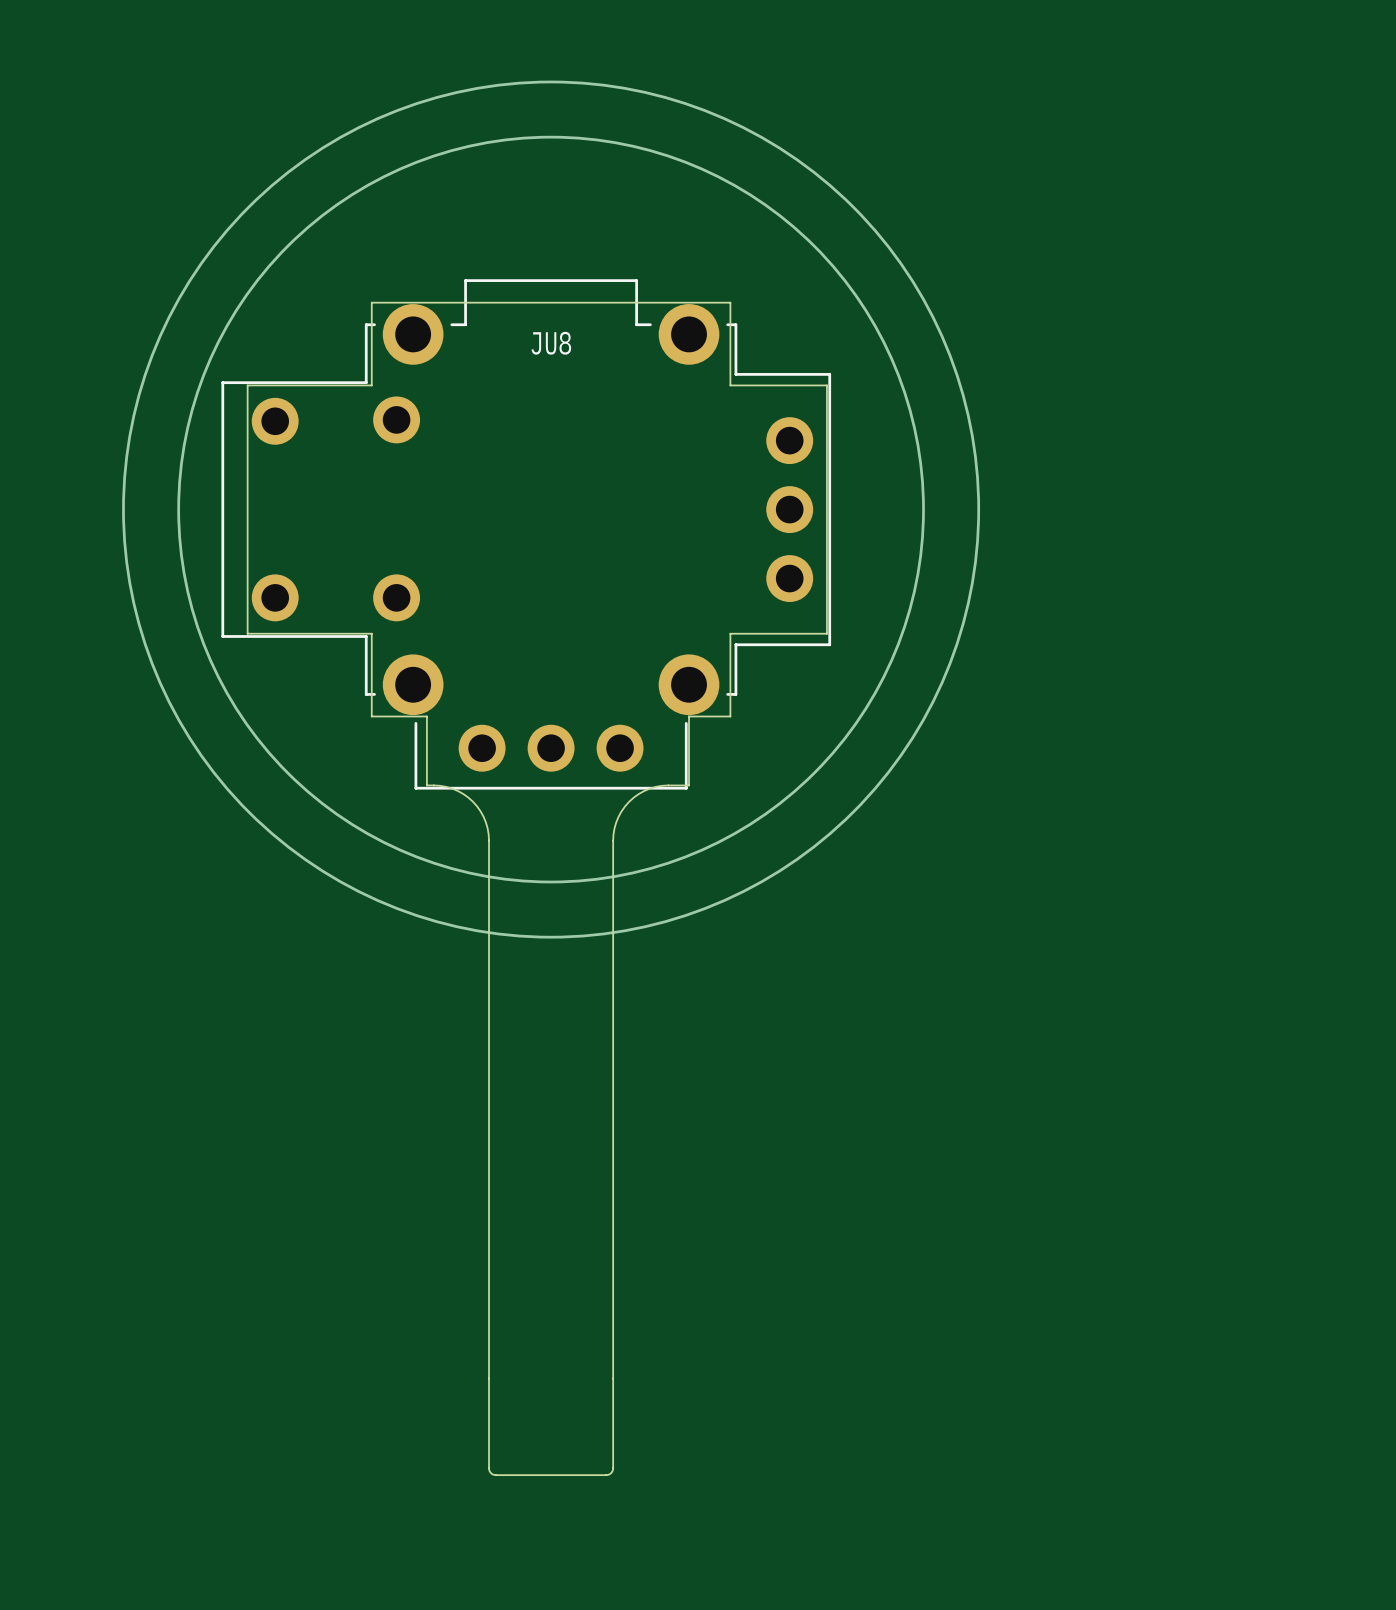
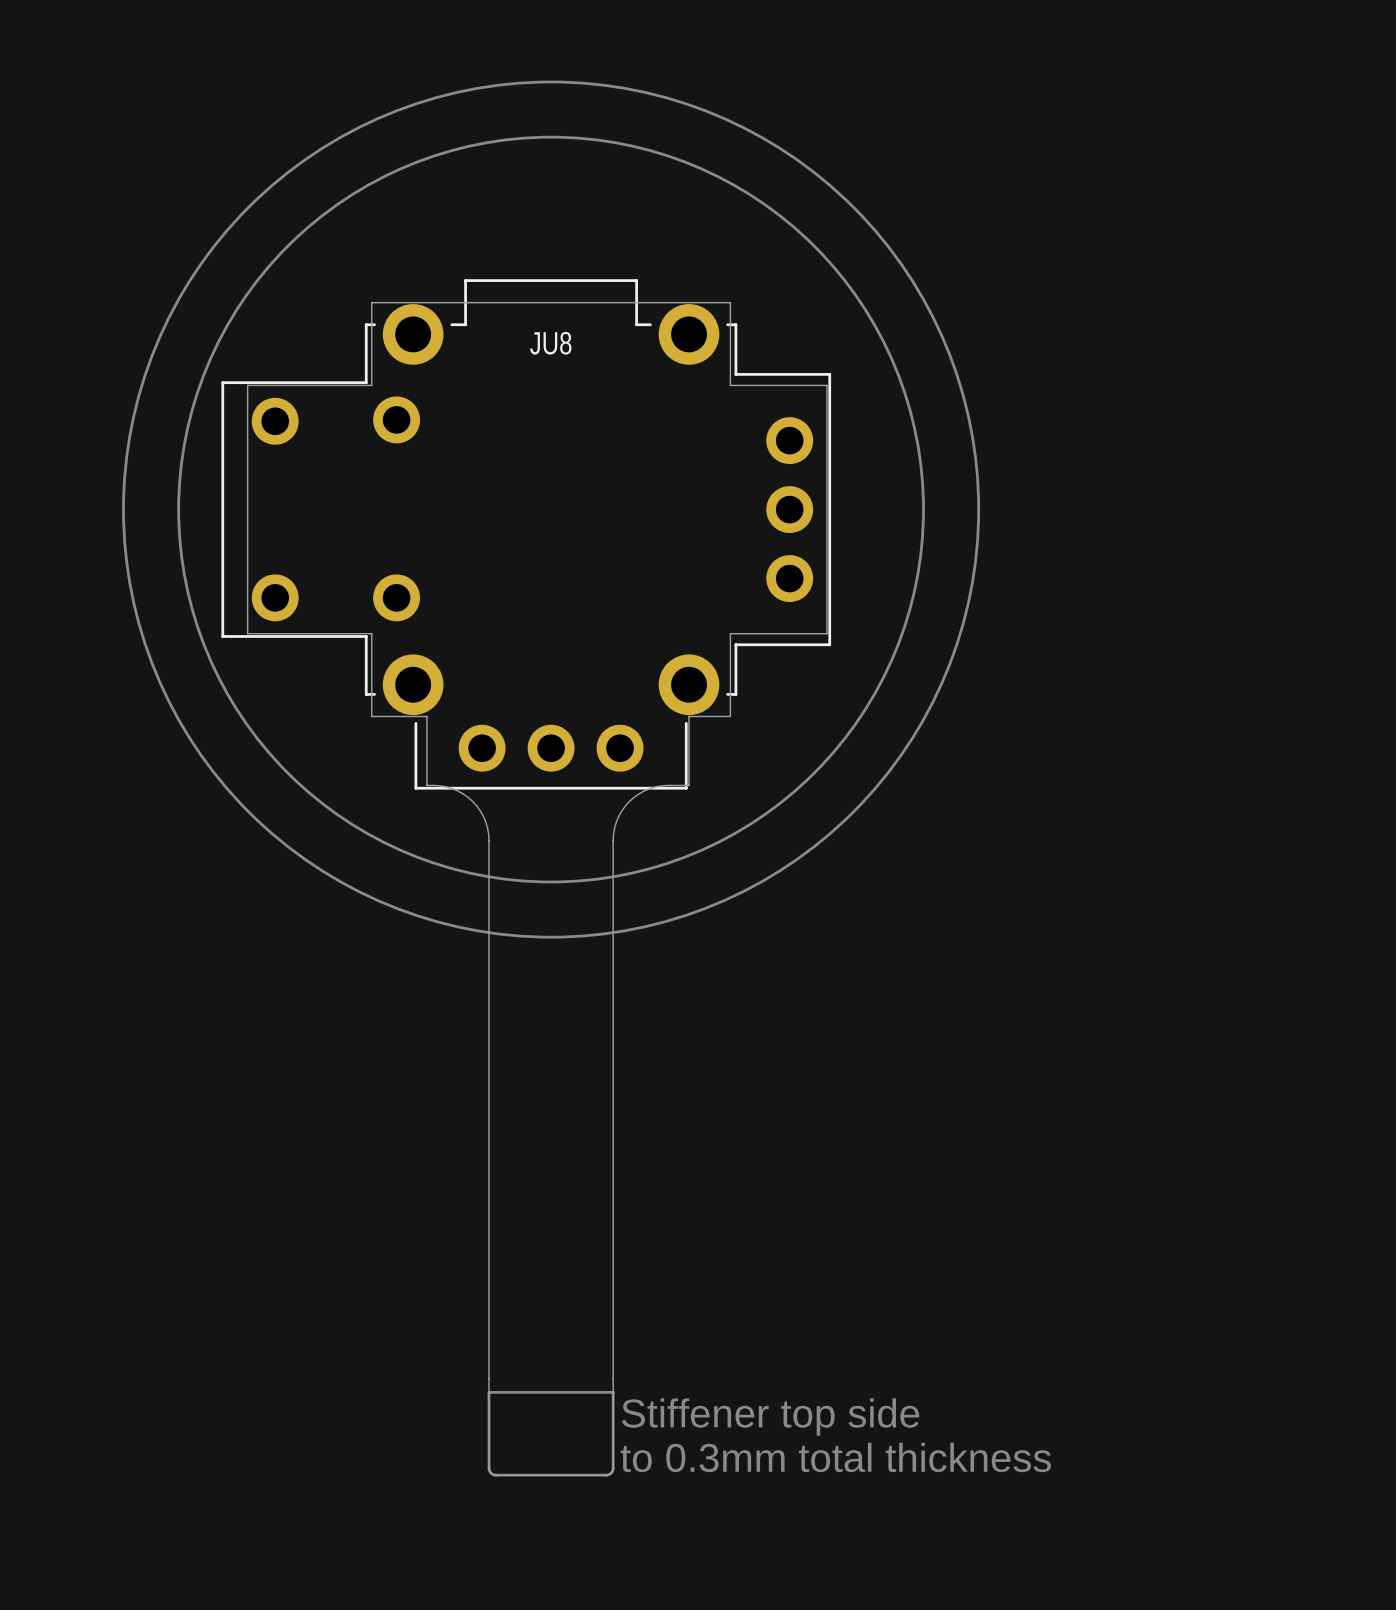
line: none -> (489, 1392) (613, 1392) (612, 1471) (606, 1475) (492, 1474) (489, 1468) (489, 1392)
text: none -> Stiffener top side (770, 1416)
text: none -> to 0.3mm total thickness (835, 1457)

